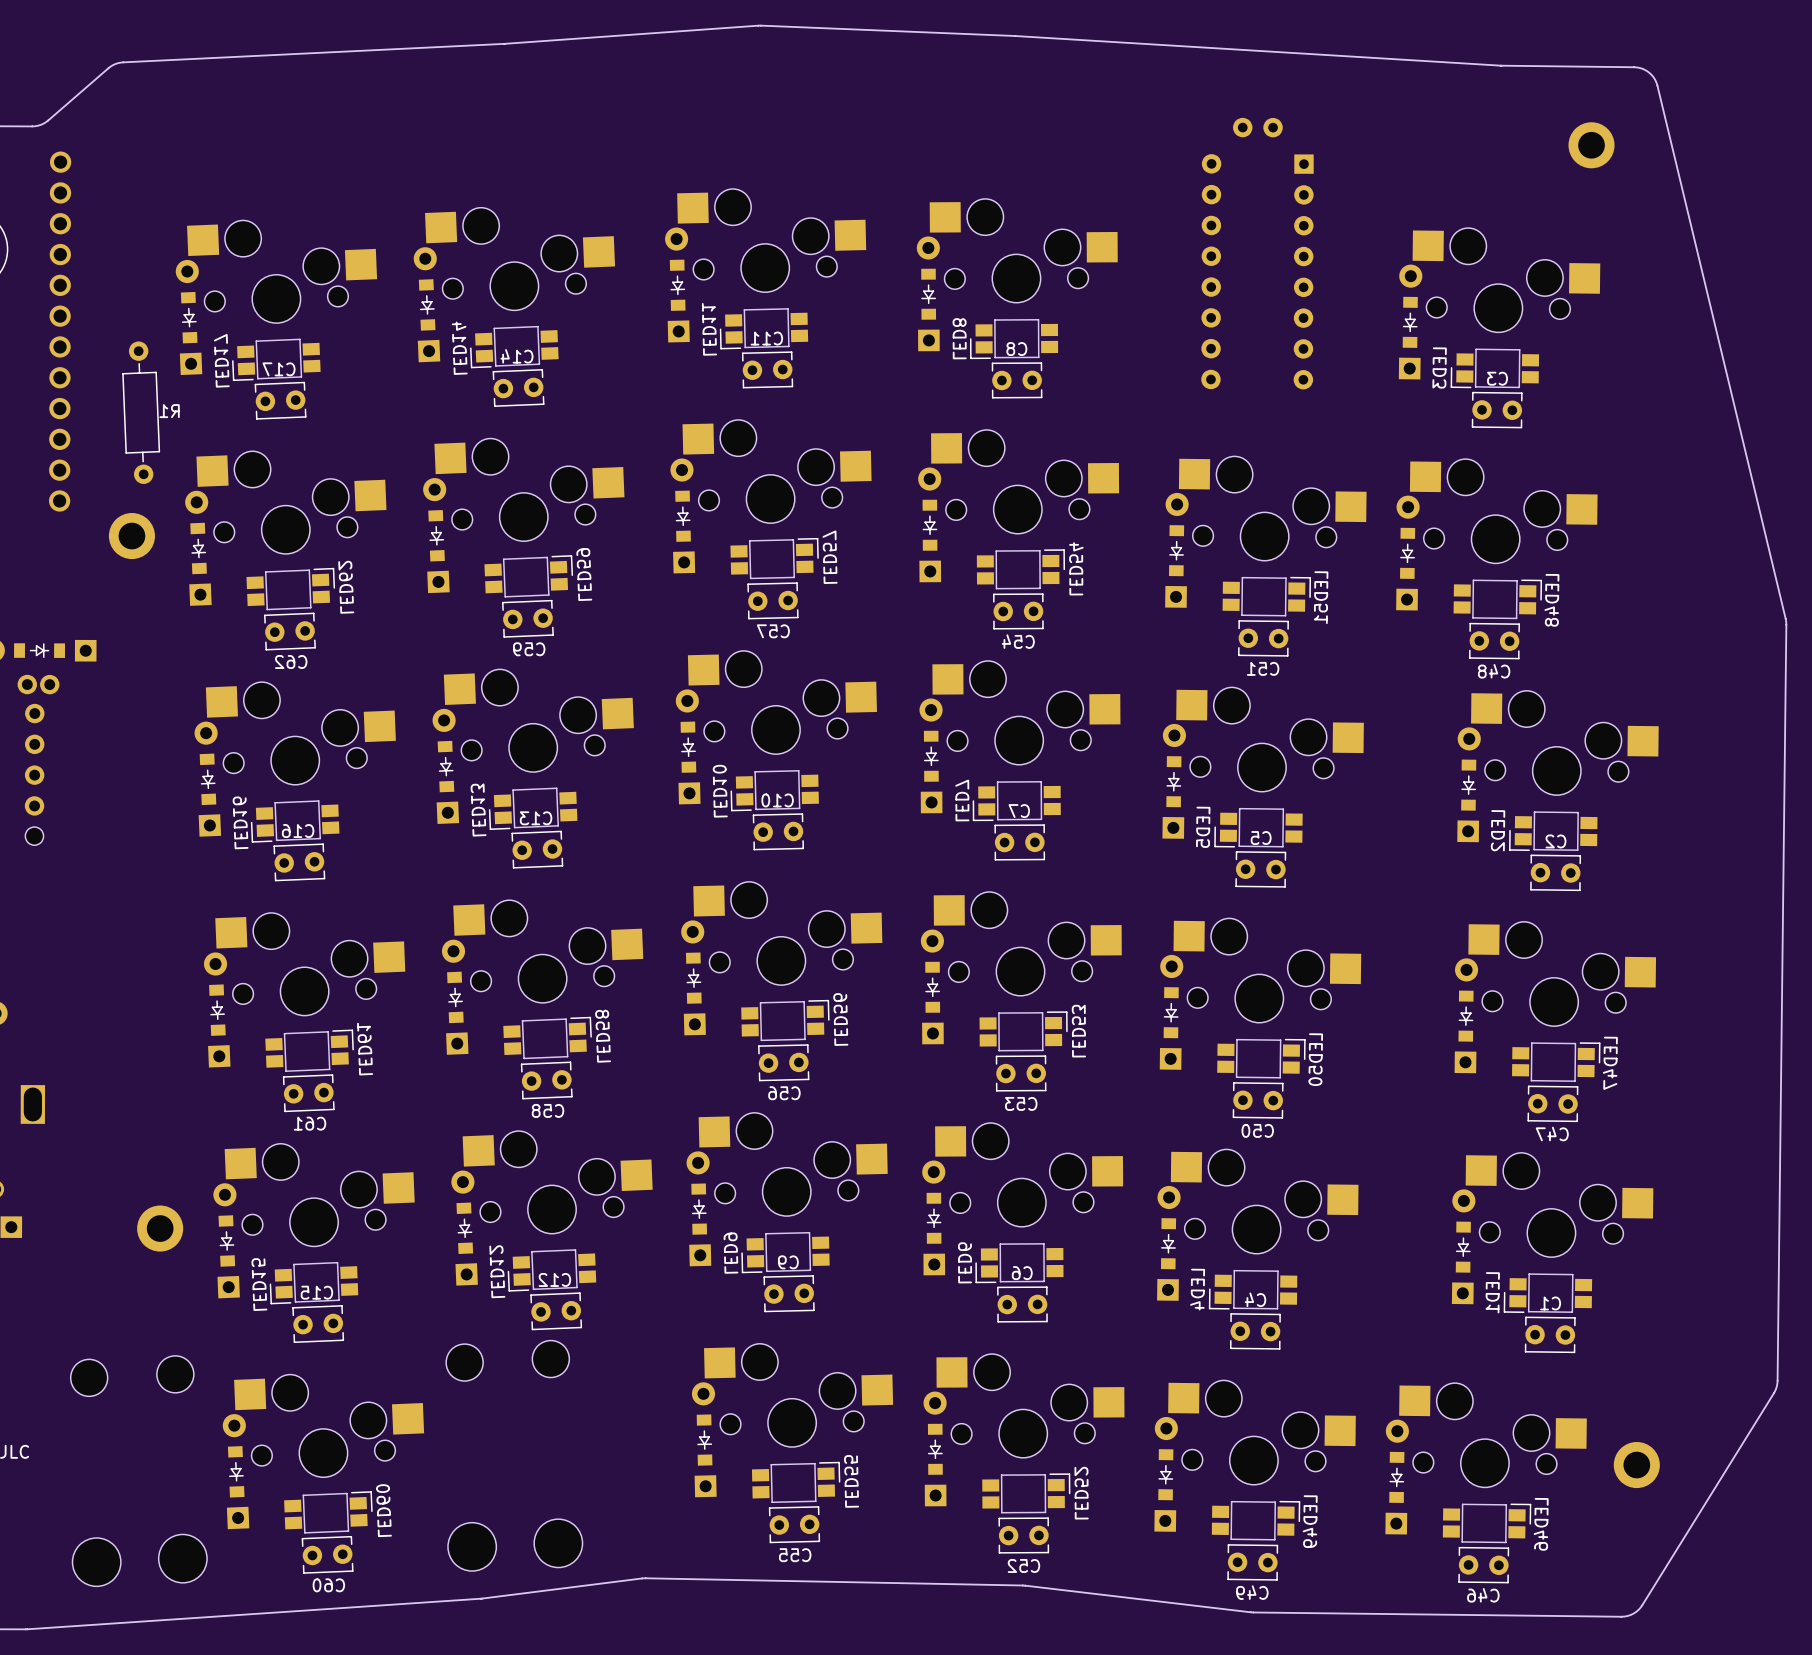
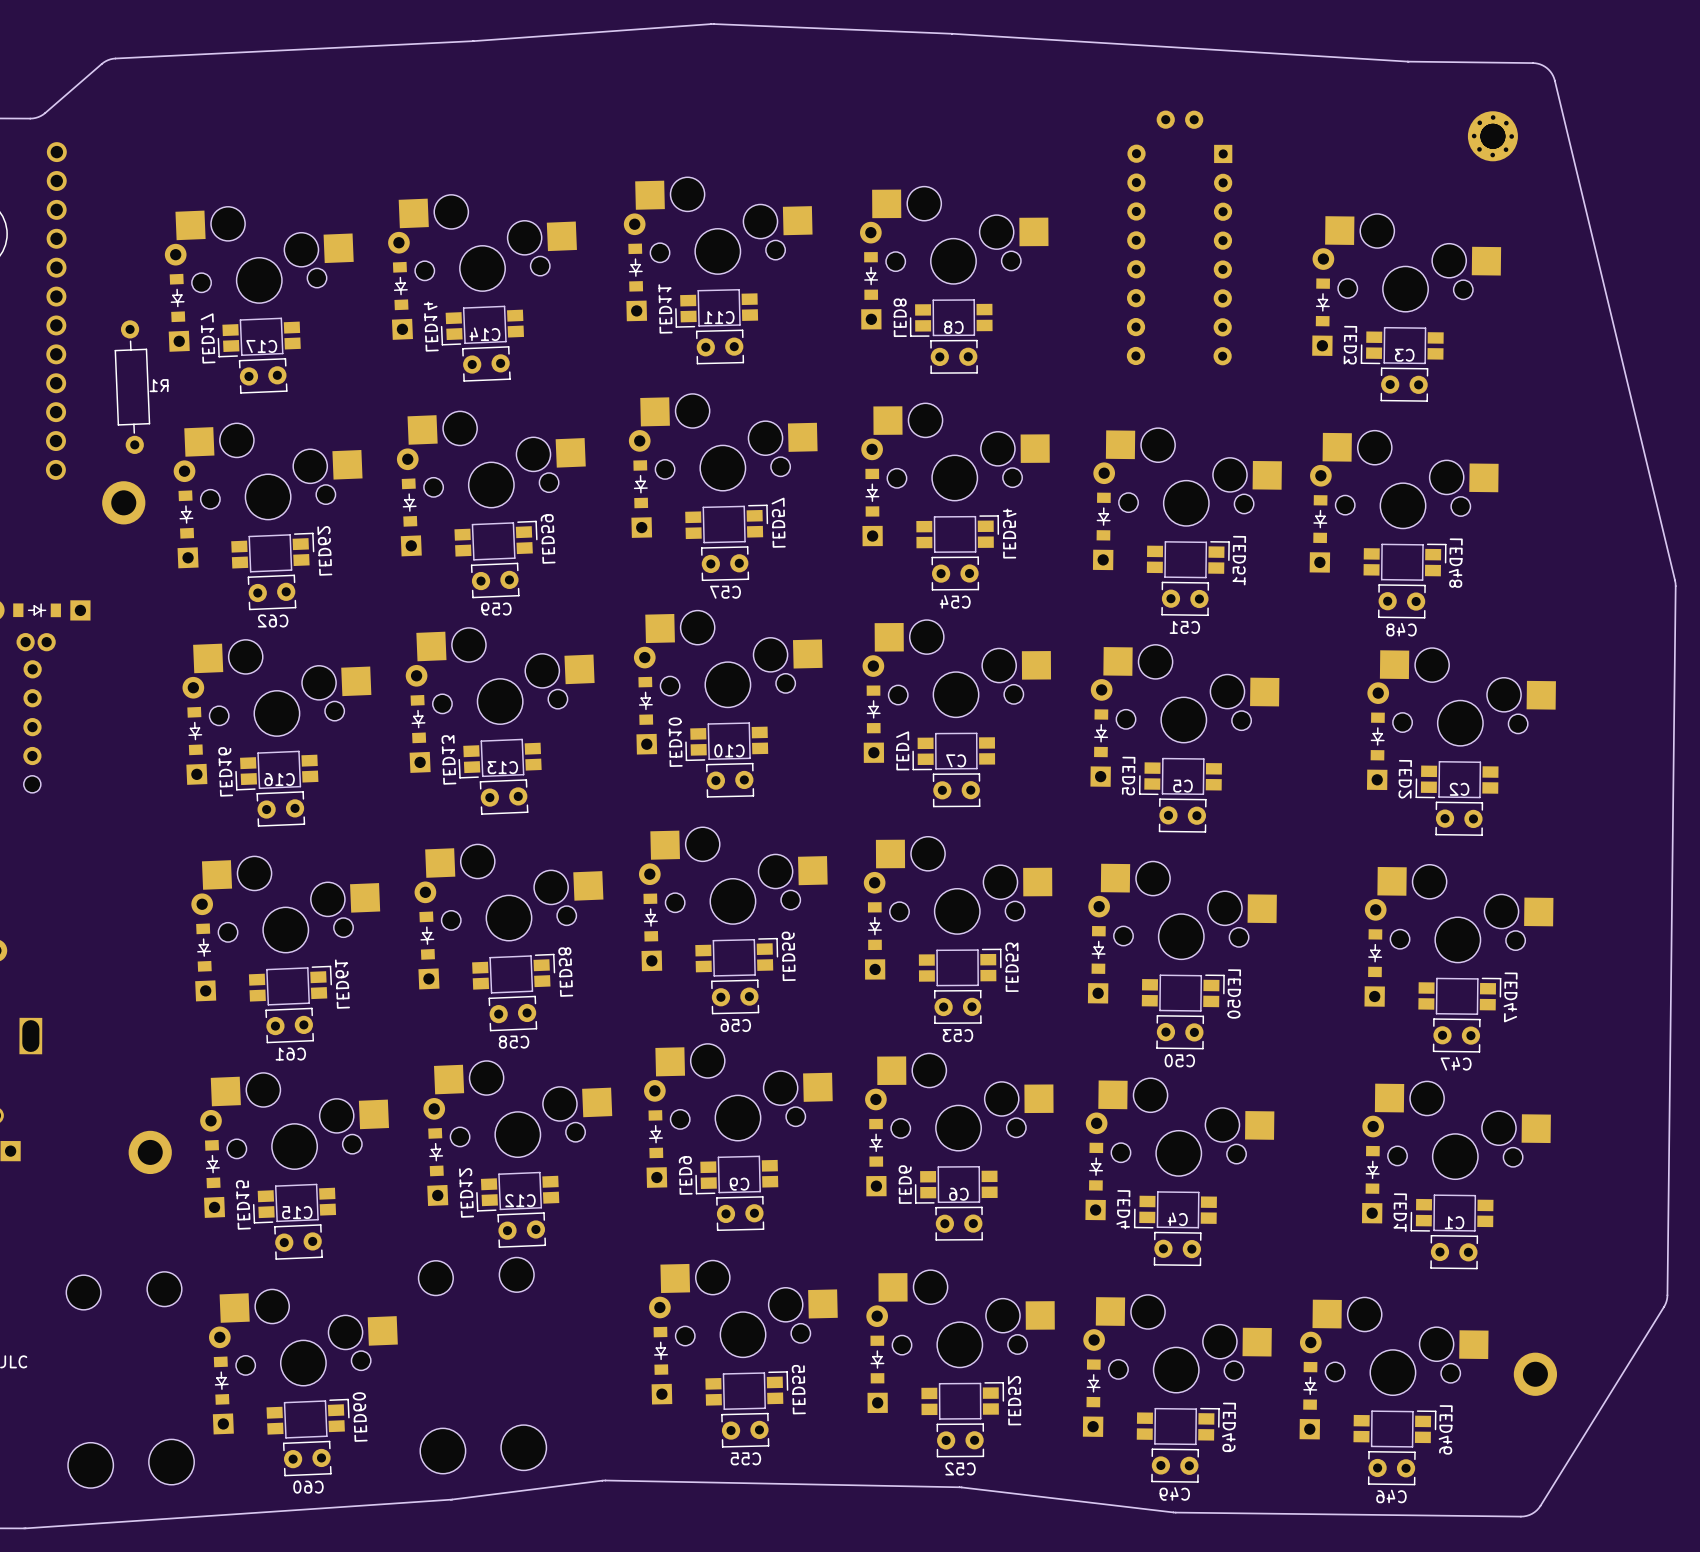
part: none -> (1492, 136)

